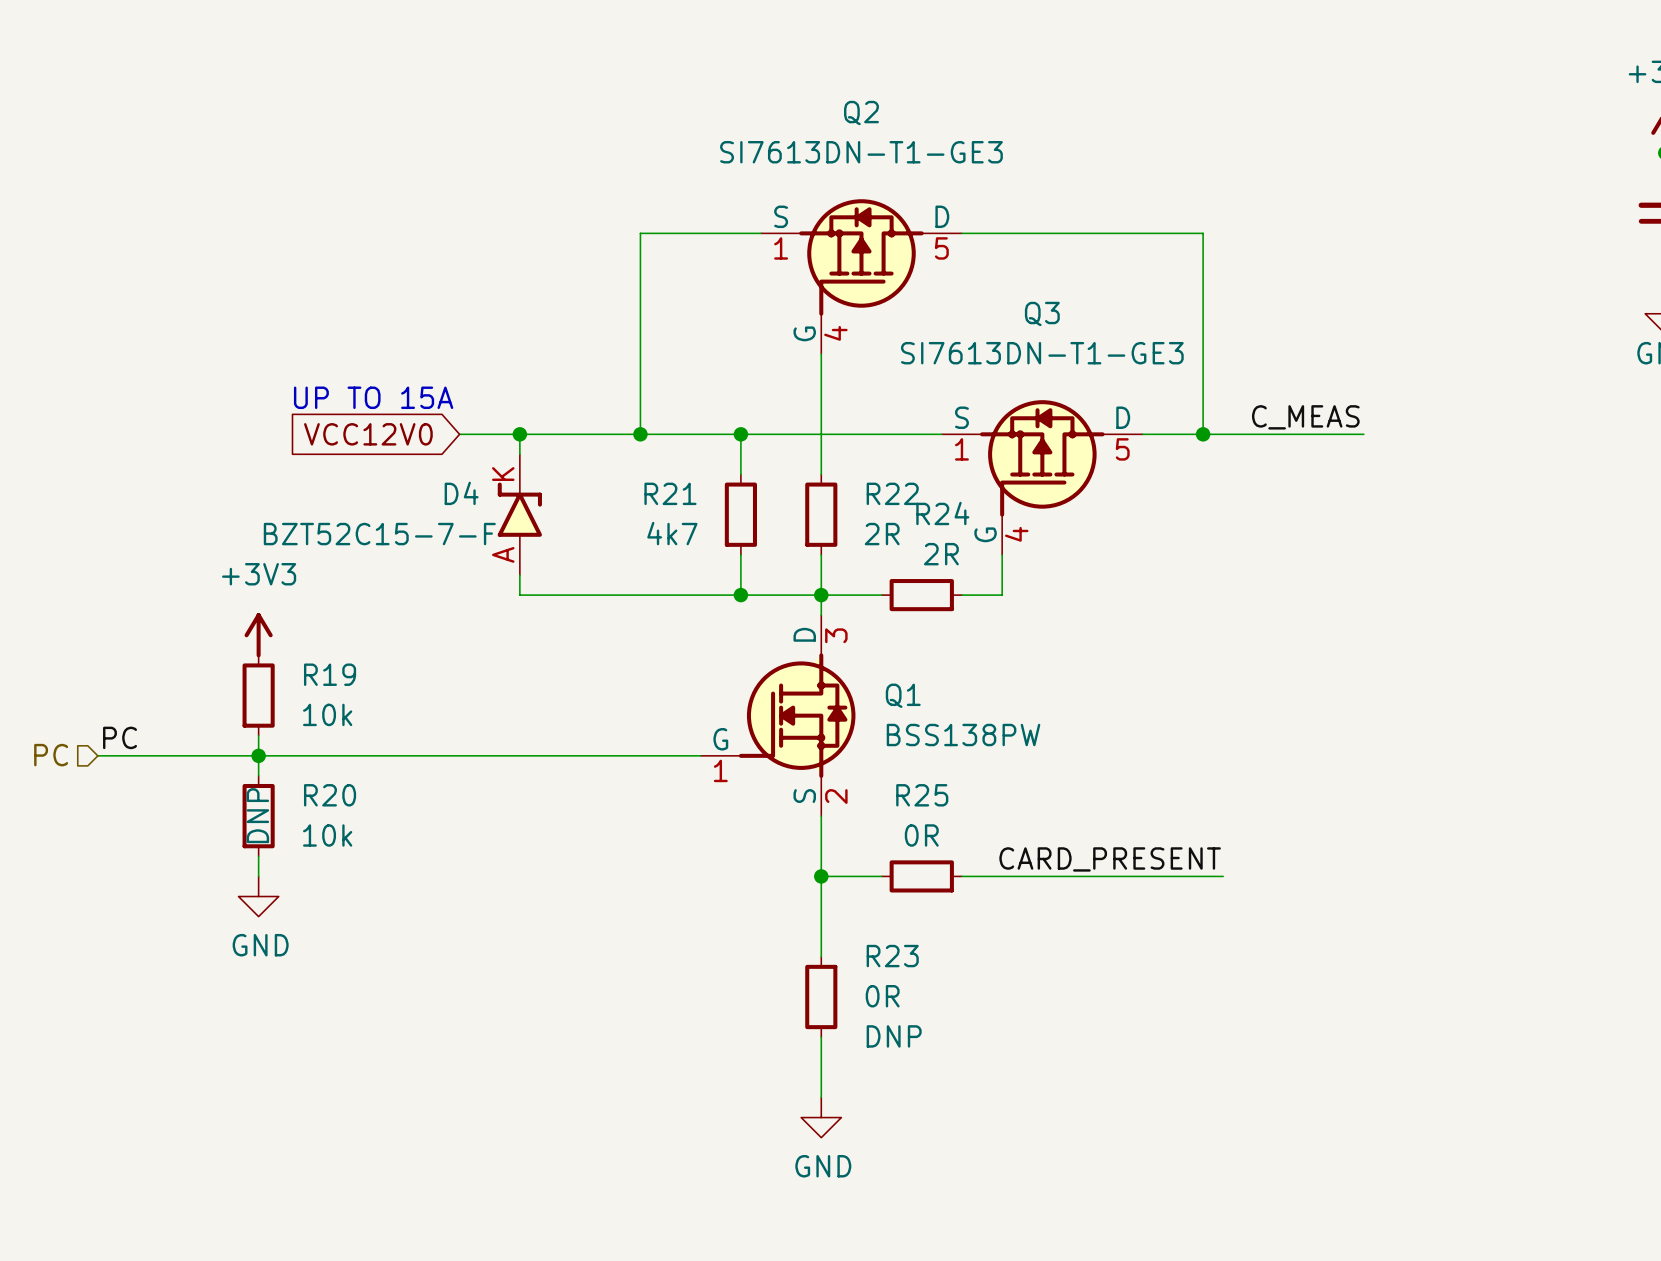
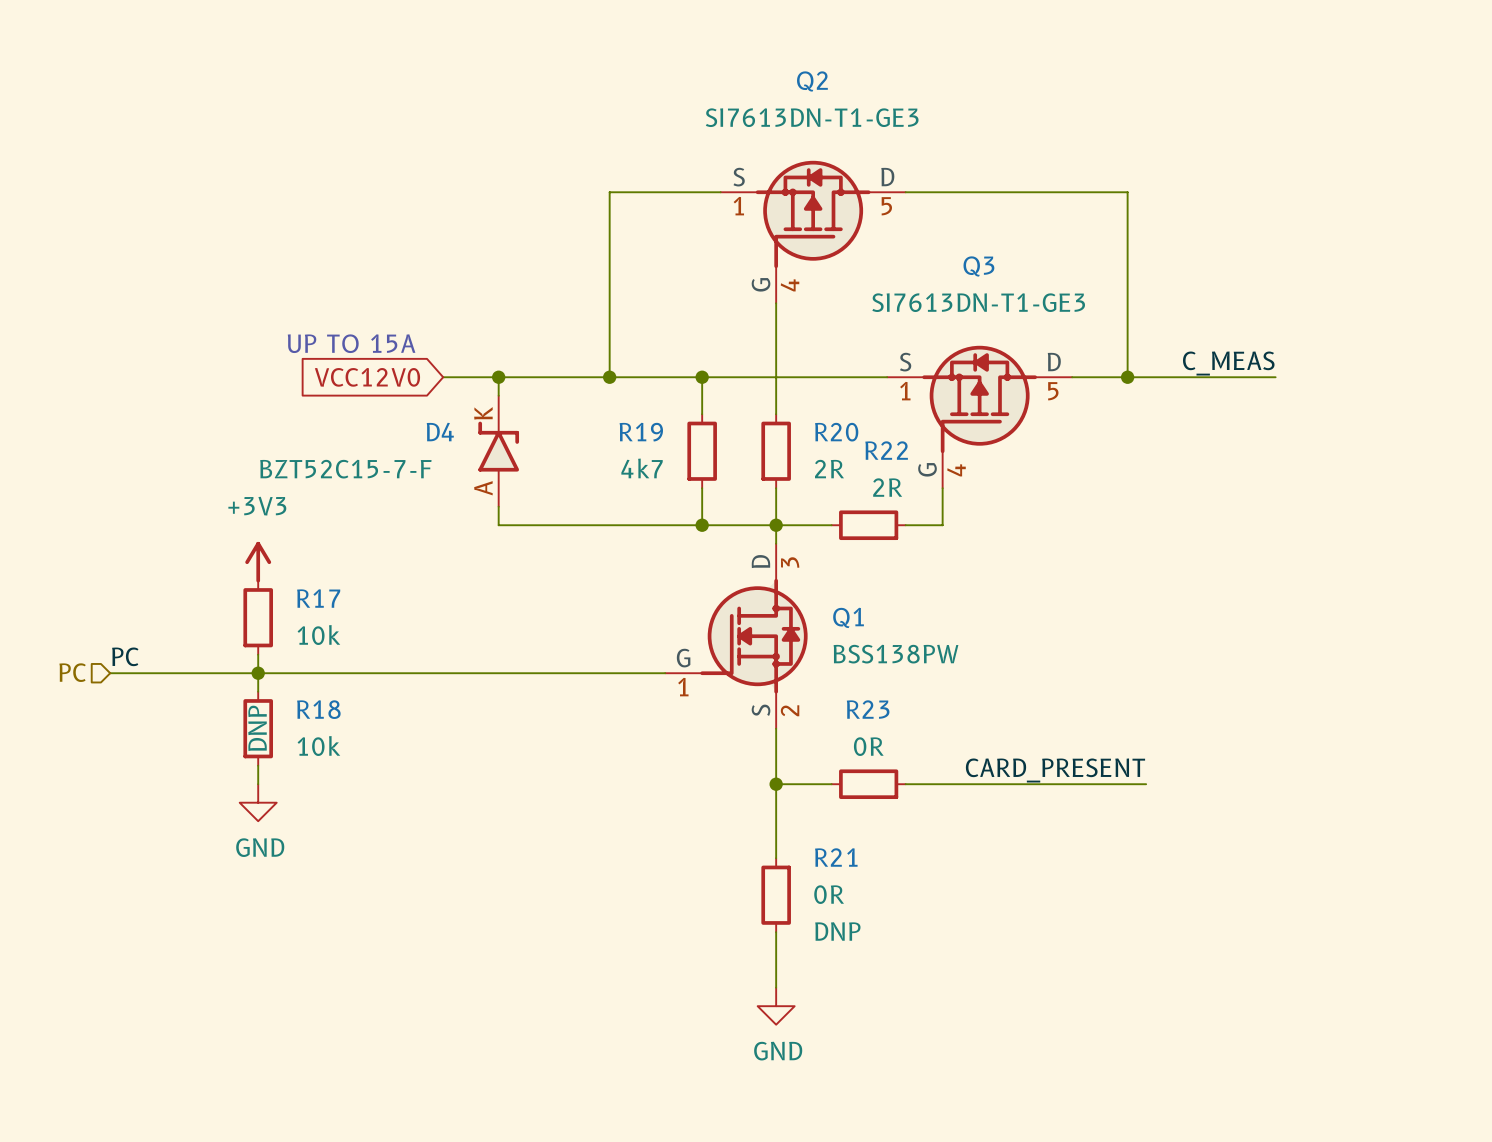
R21 name: R21 (670, 493) -> R19 (641, 432)
R22 name: R22 (892, 493) -> R20 (836, 432)
R24 name: R24 (942, 513) -> R22 (886, 450)
R19 name: R19 (330, 674) -> R17 (318, 598)
R20 name: R20 (330, 795) -> R18 (318, 709)
R25 name: R25 (922, 795) -> R23 (868, 709)
R23 name: R23 (892, 956) -> R21 (836, 857)

